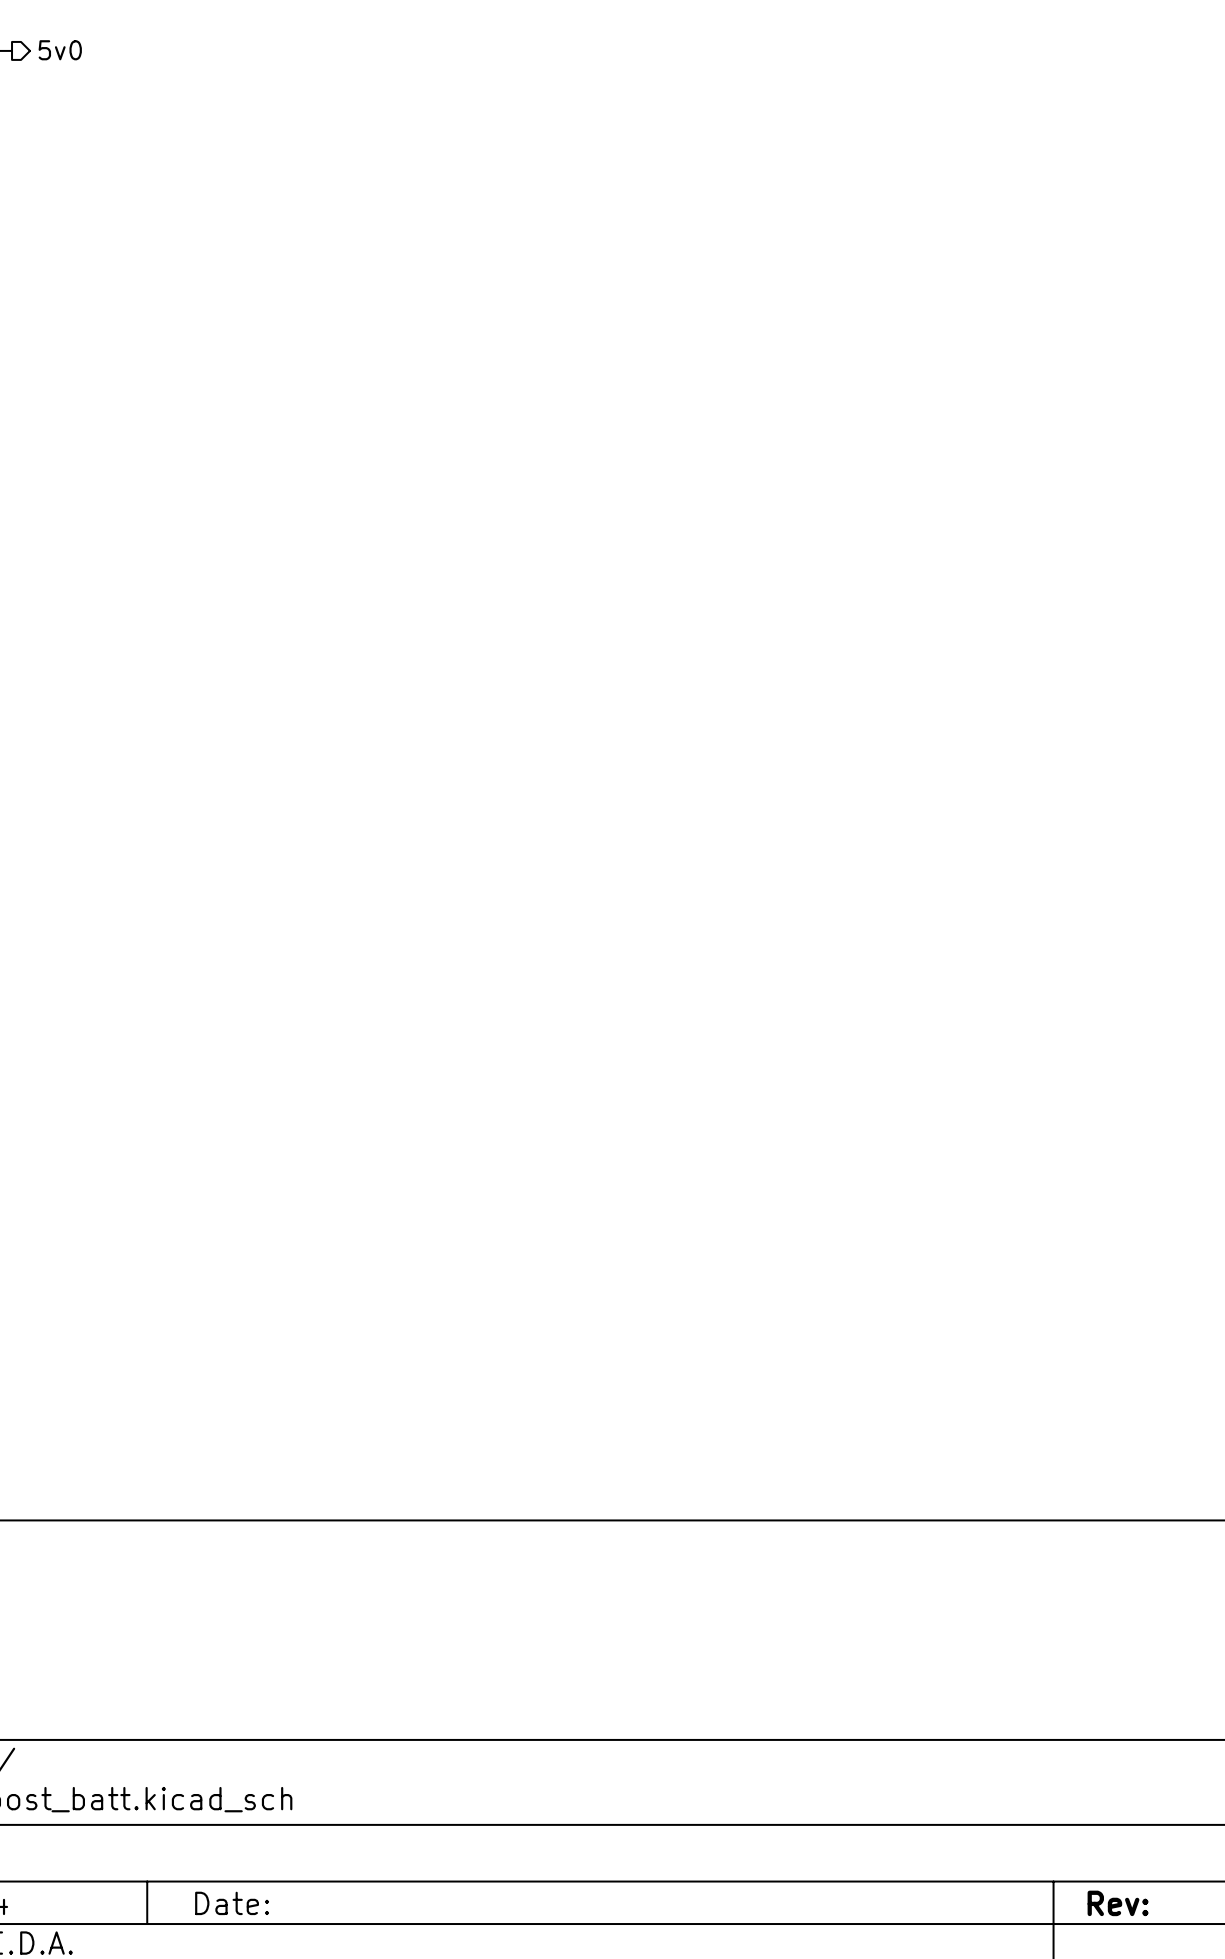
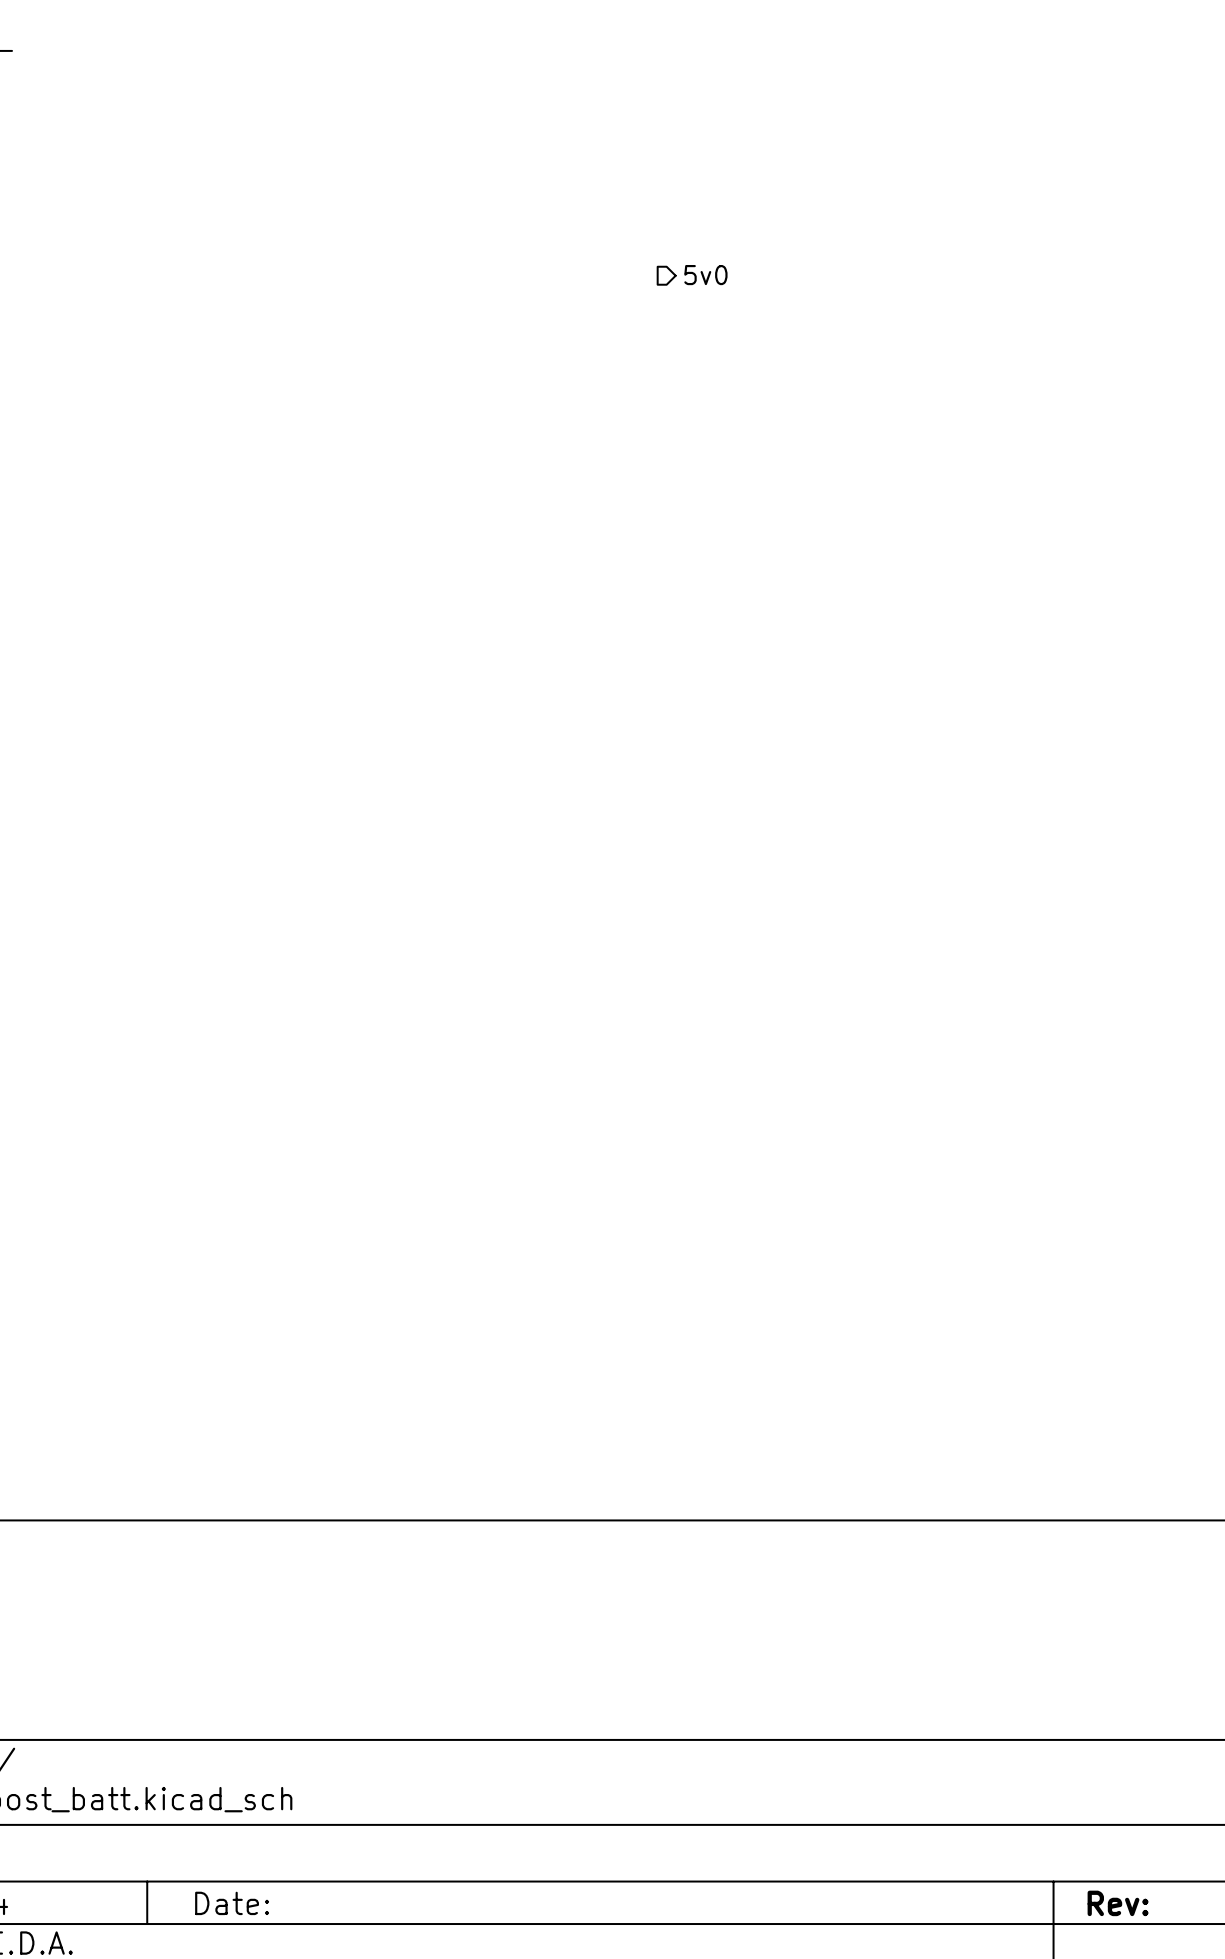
hierarchical label: 5v0 (60, 50) -> none
hierarchical label: none -> 5v0 (705, 275)

